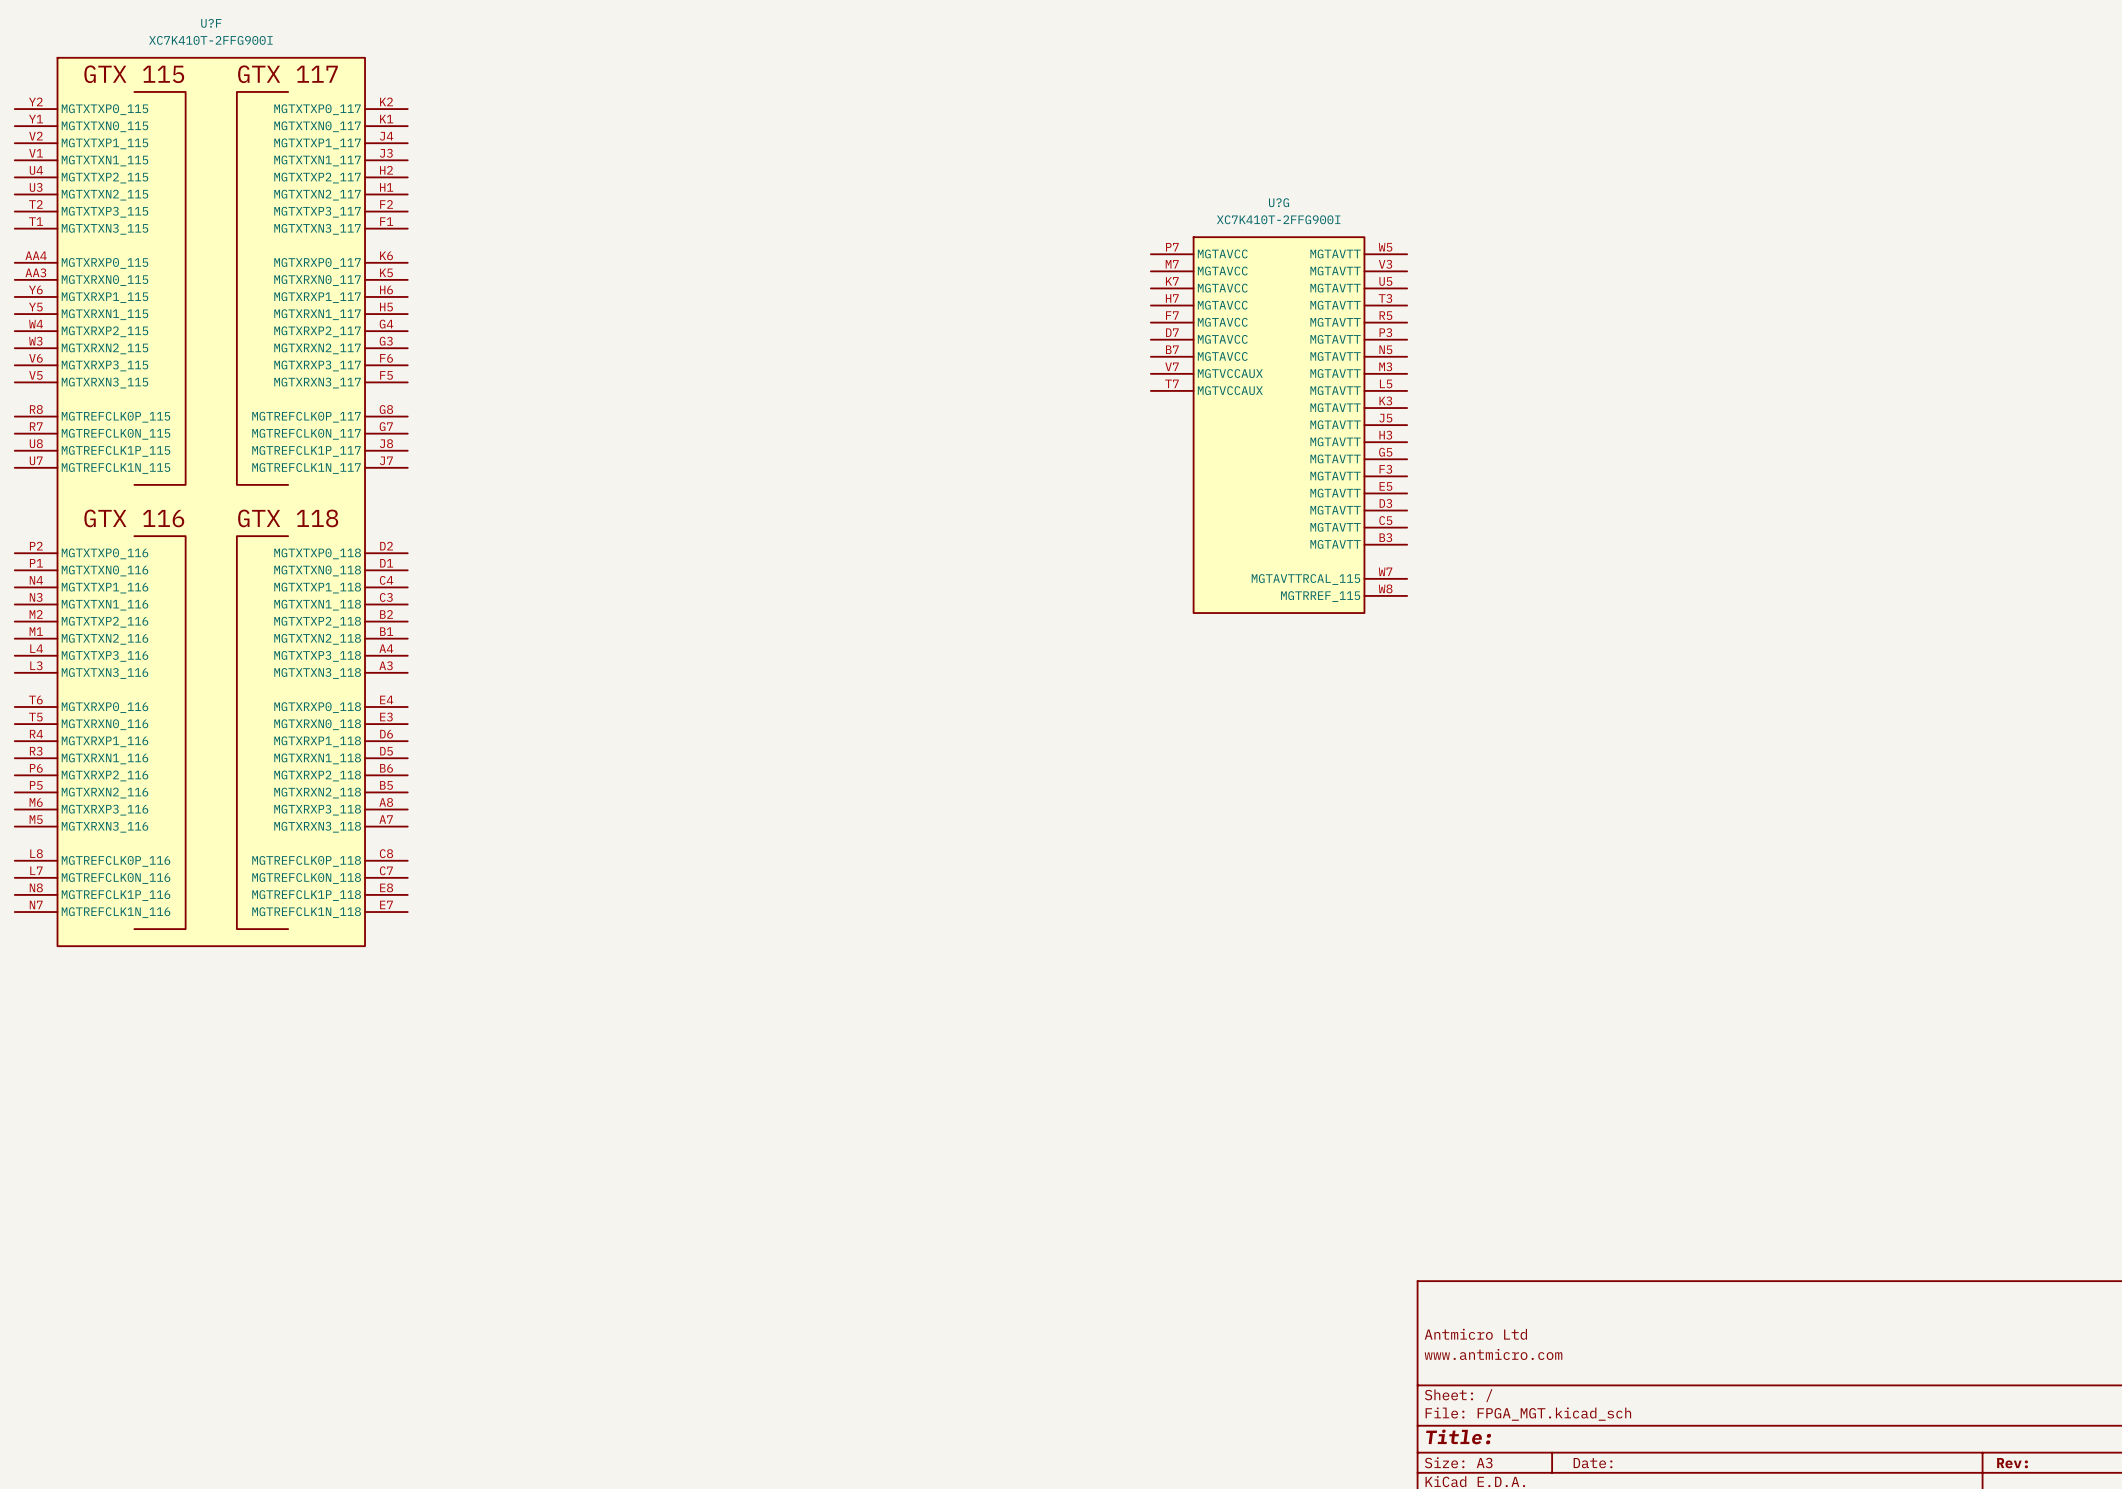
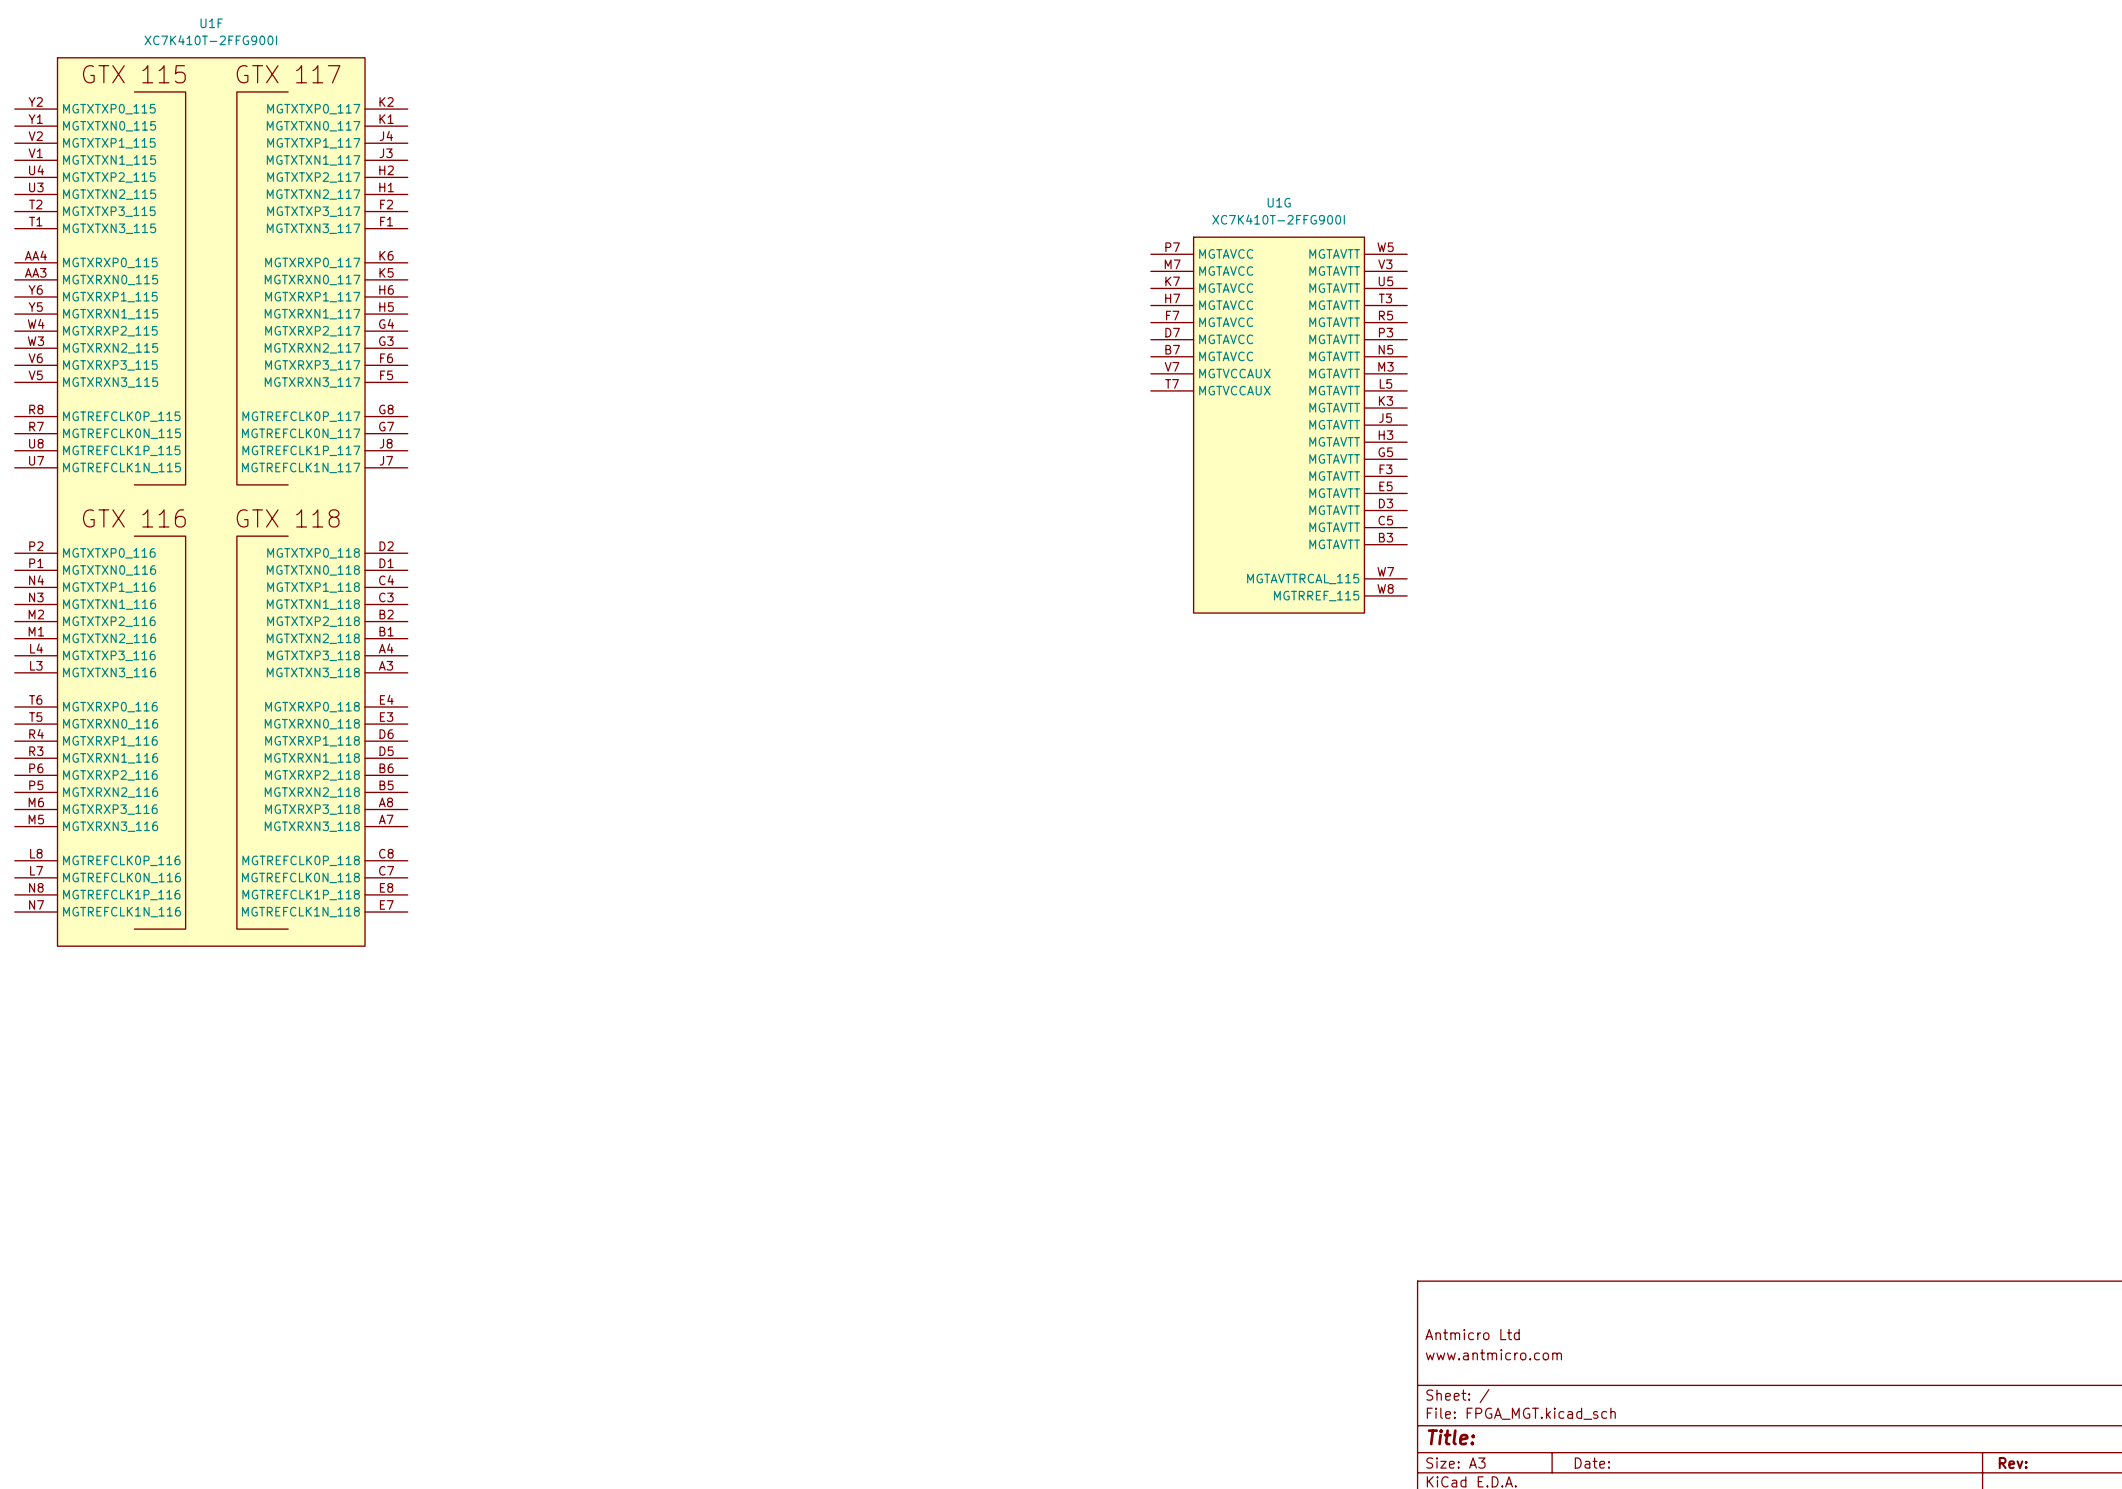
U?F name: U?F (211, 23) -> U1F (211, 23)
U?G name: U?G (1279, 202) -> U1G (1279, 202)

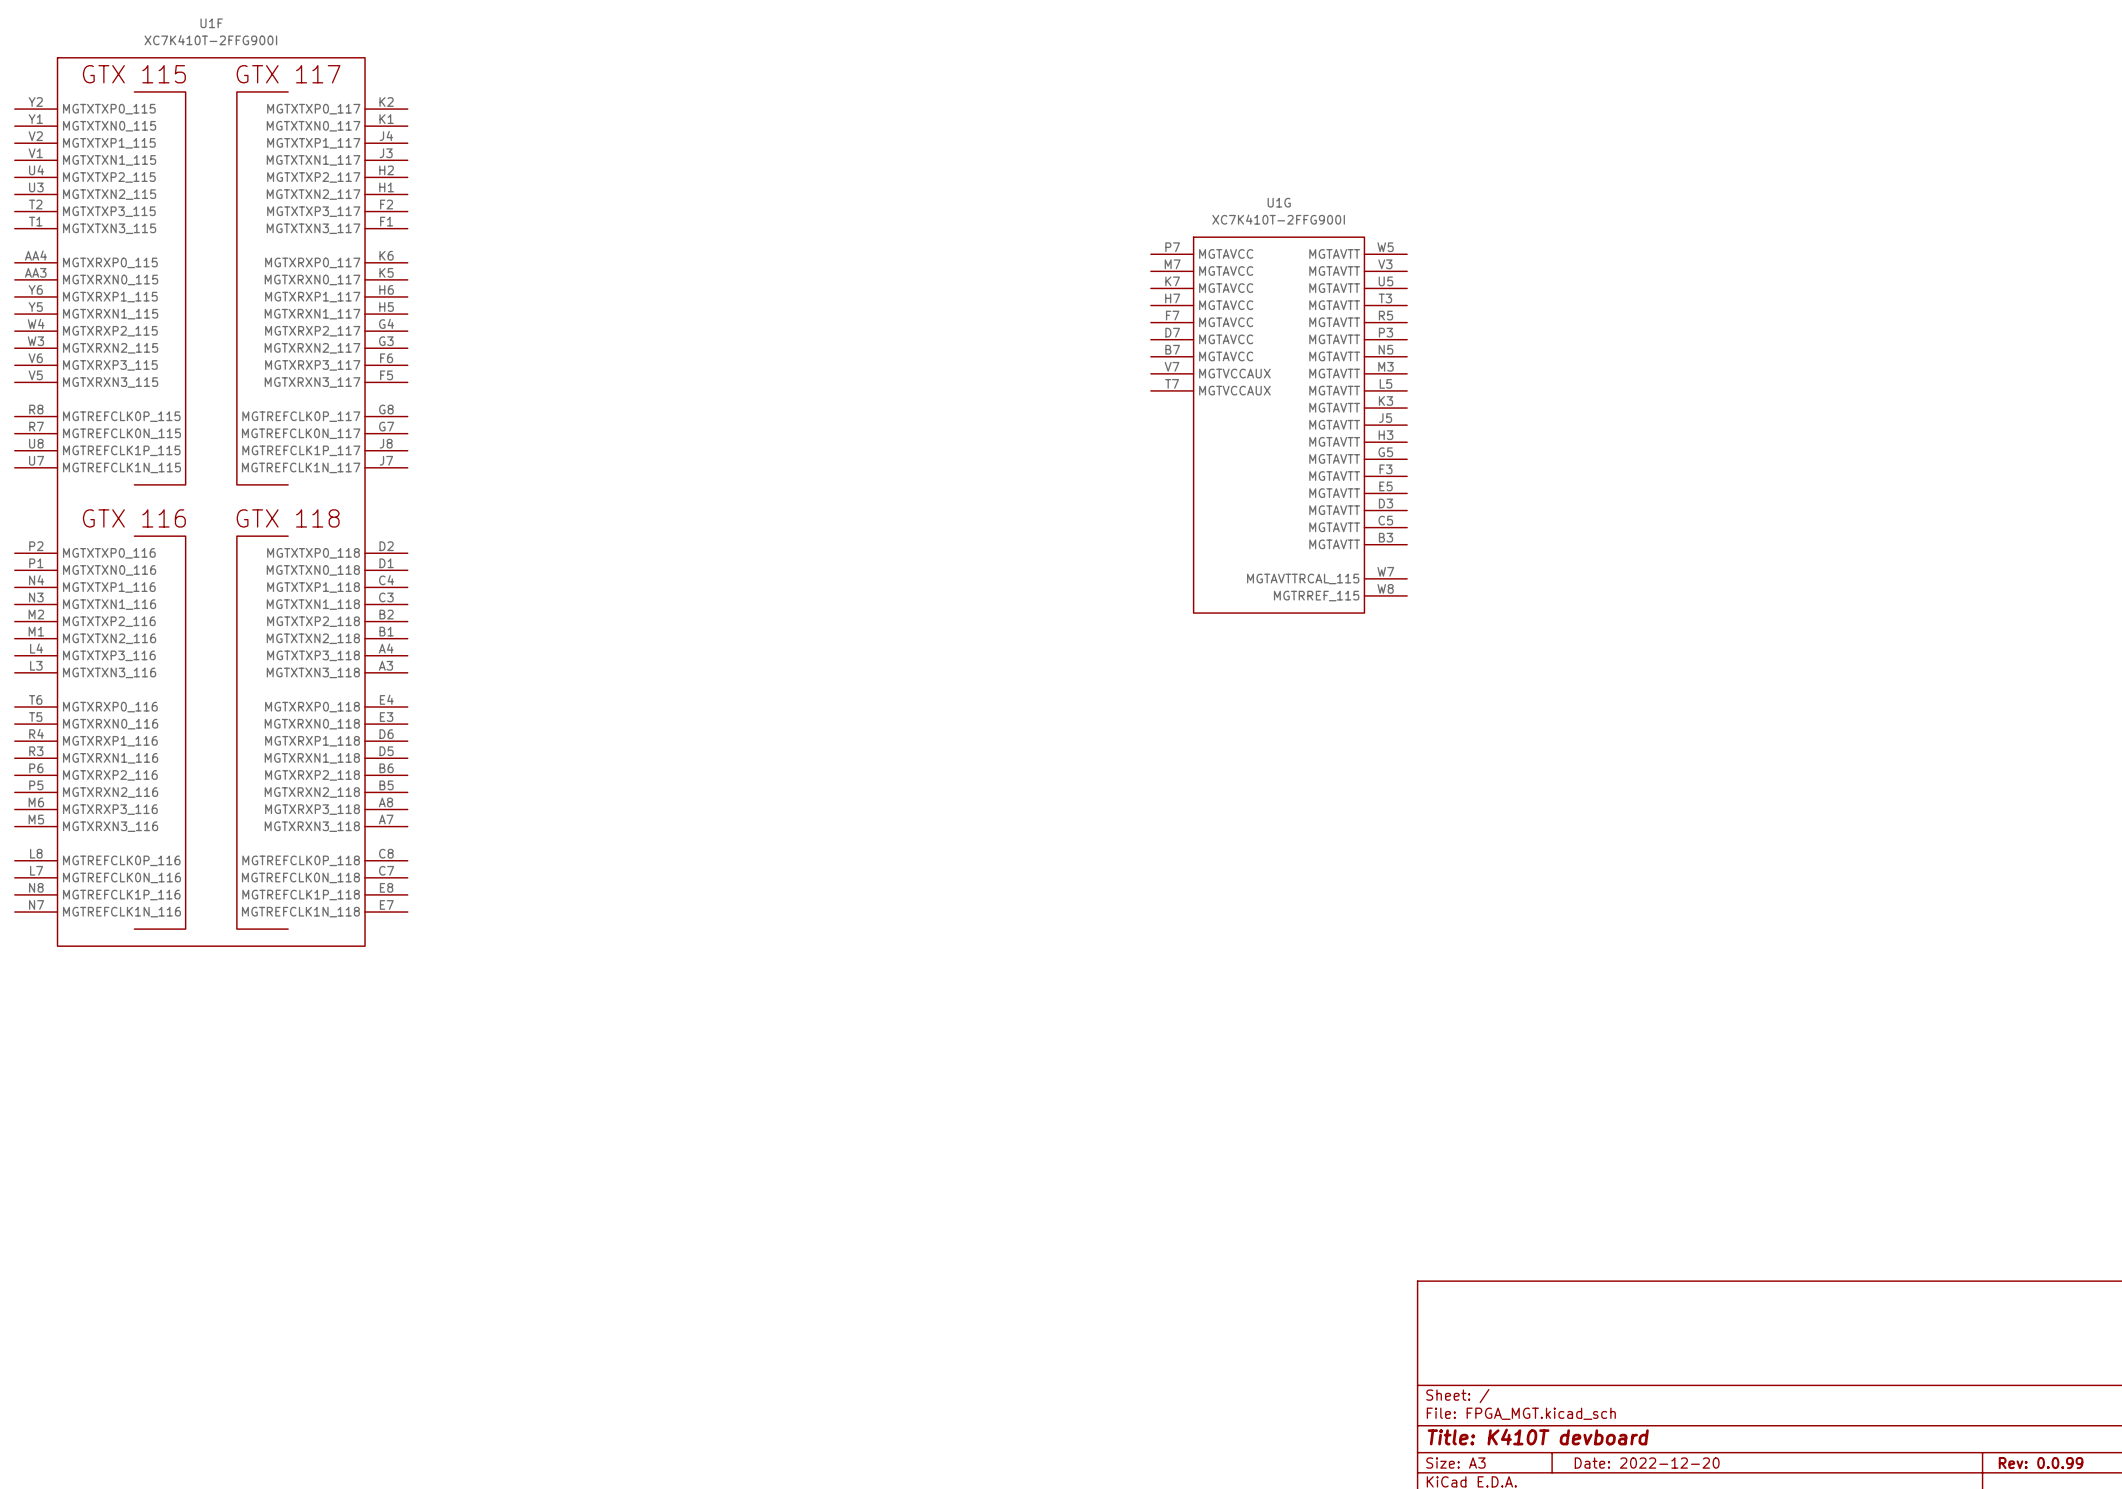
title block: Antmicro Ltd (1472, 1334) -> none
title block: www.antmicro.com (1493, 1354) -> none
title block: Title: (1451, 1437) -> Title: K410T devboard (1538, 1437)
title block: Date: (1592, 1463) -> Date: 2022-12-20 (1647, 1463)
title block: Rev: (2013, 1463) -> Rev: 0.0.99 (2041, 1463)

